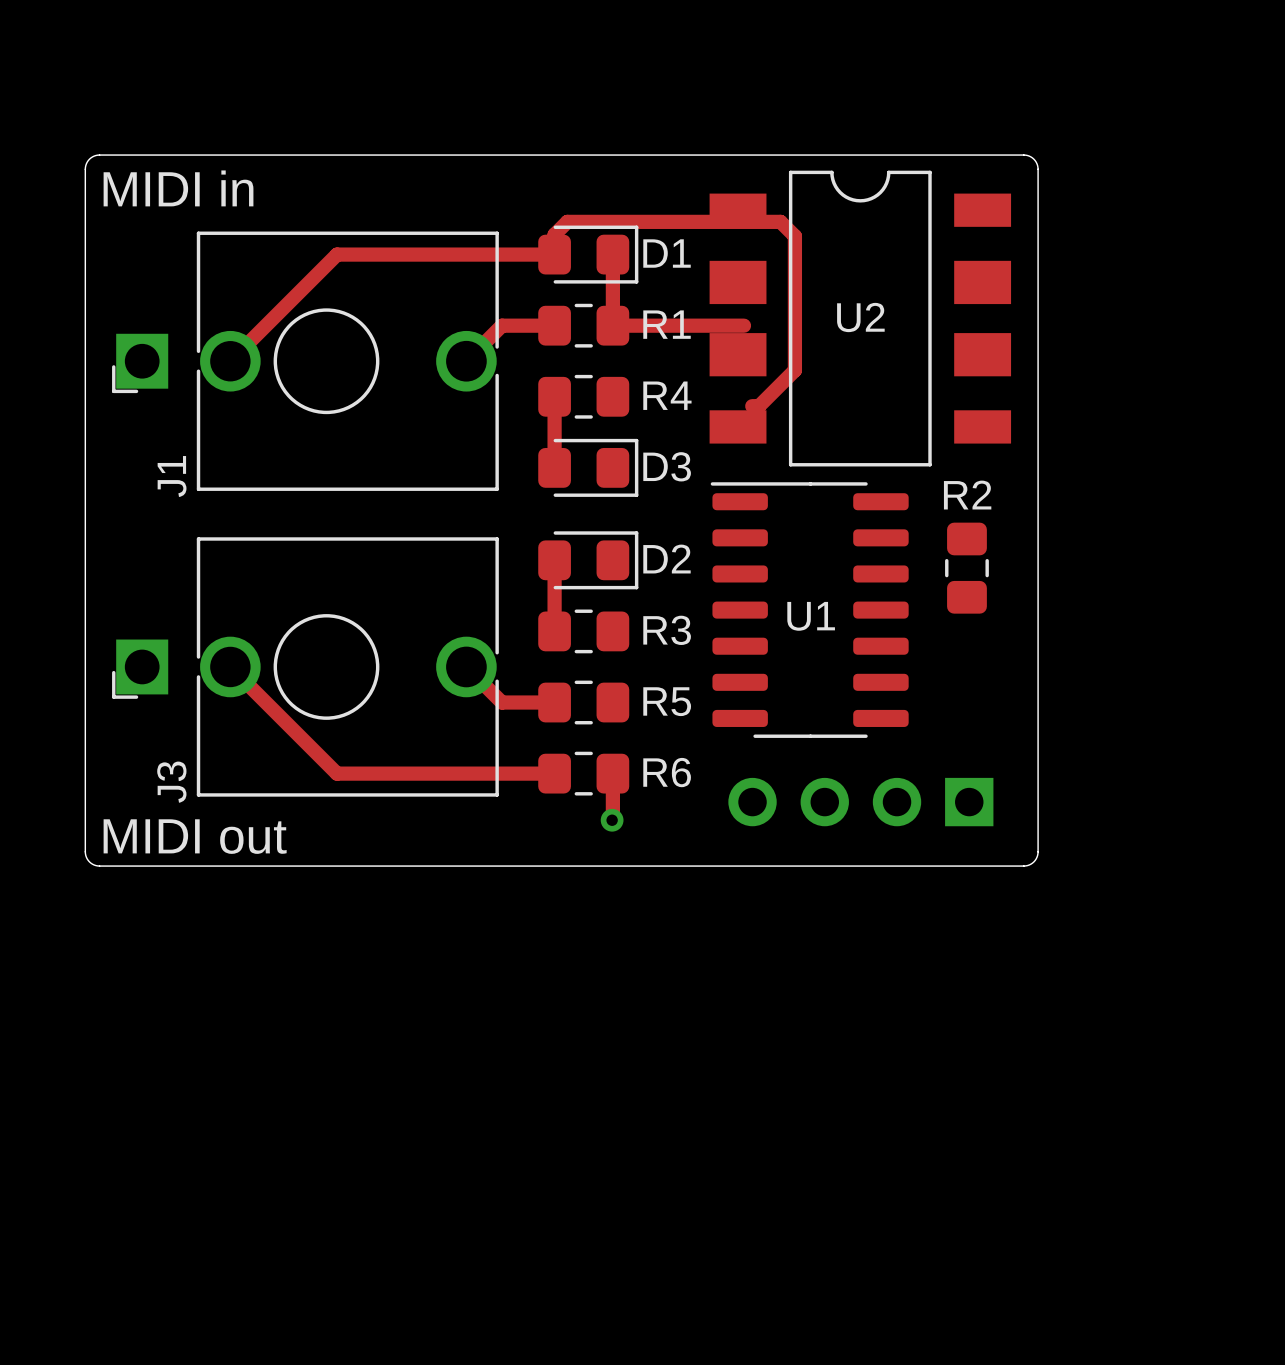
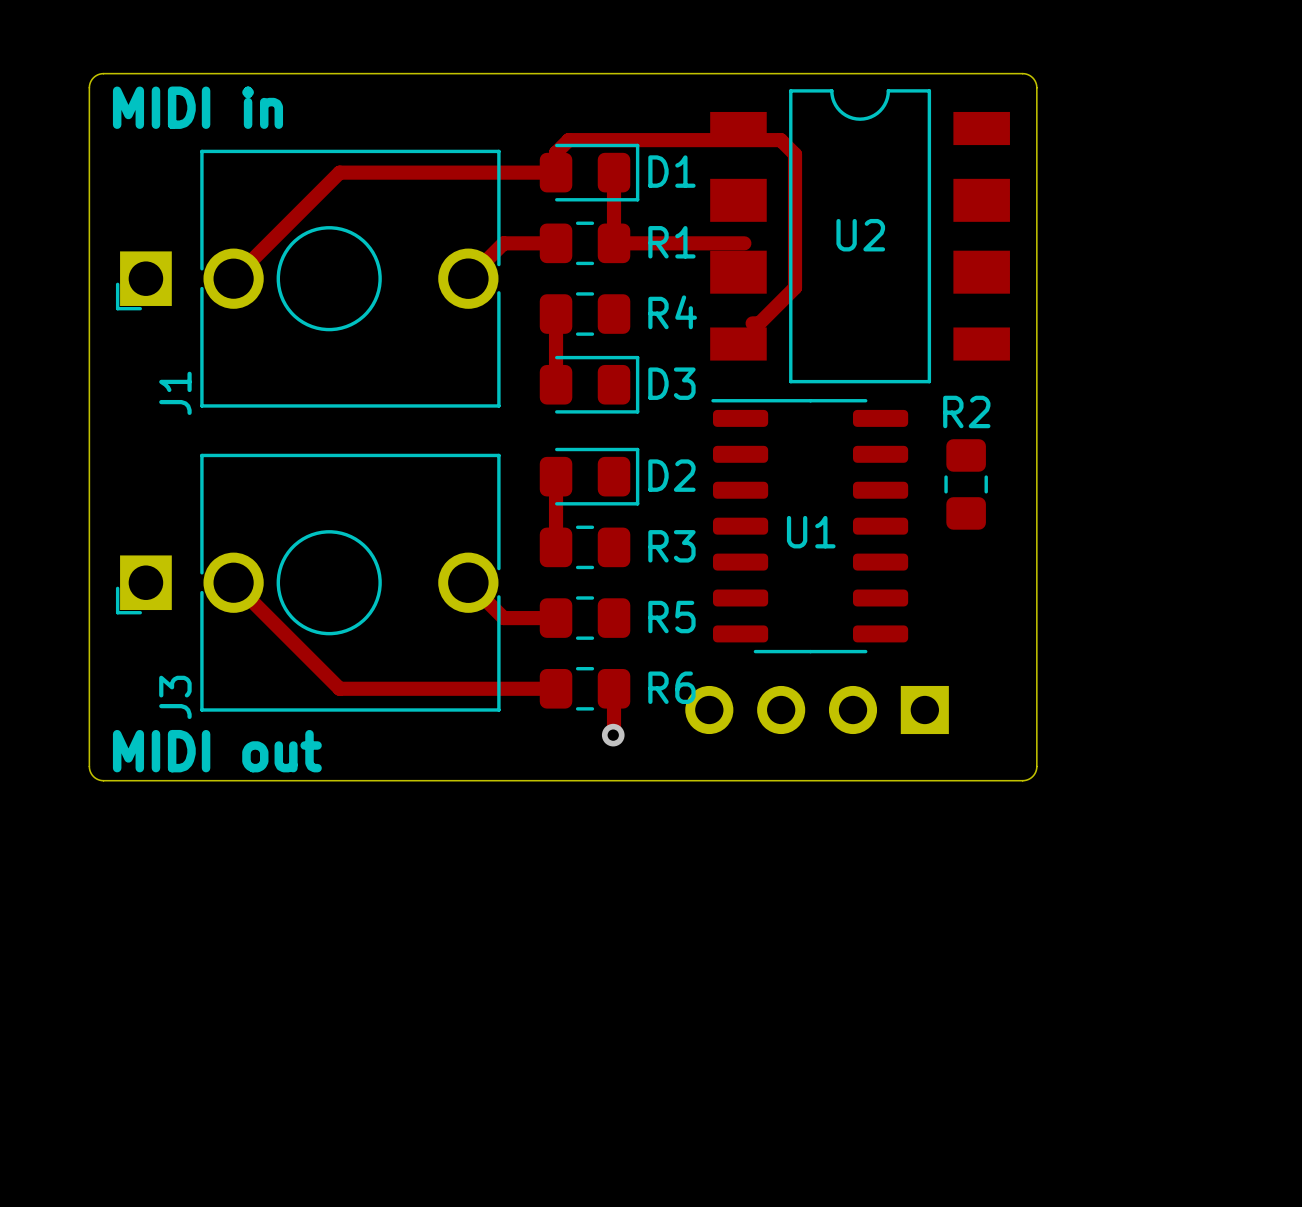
part position: (860, 802) -> (817, 710)

